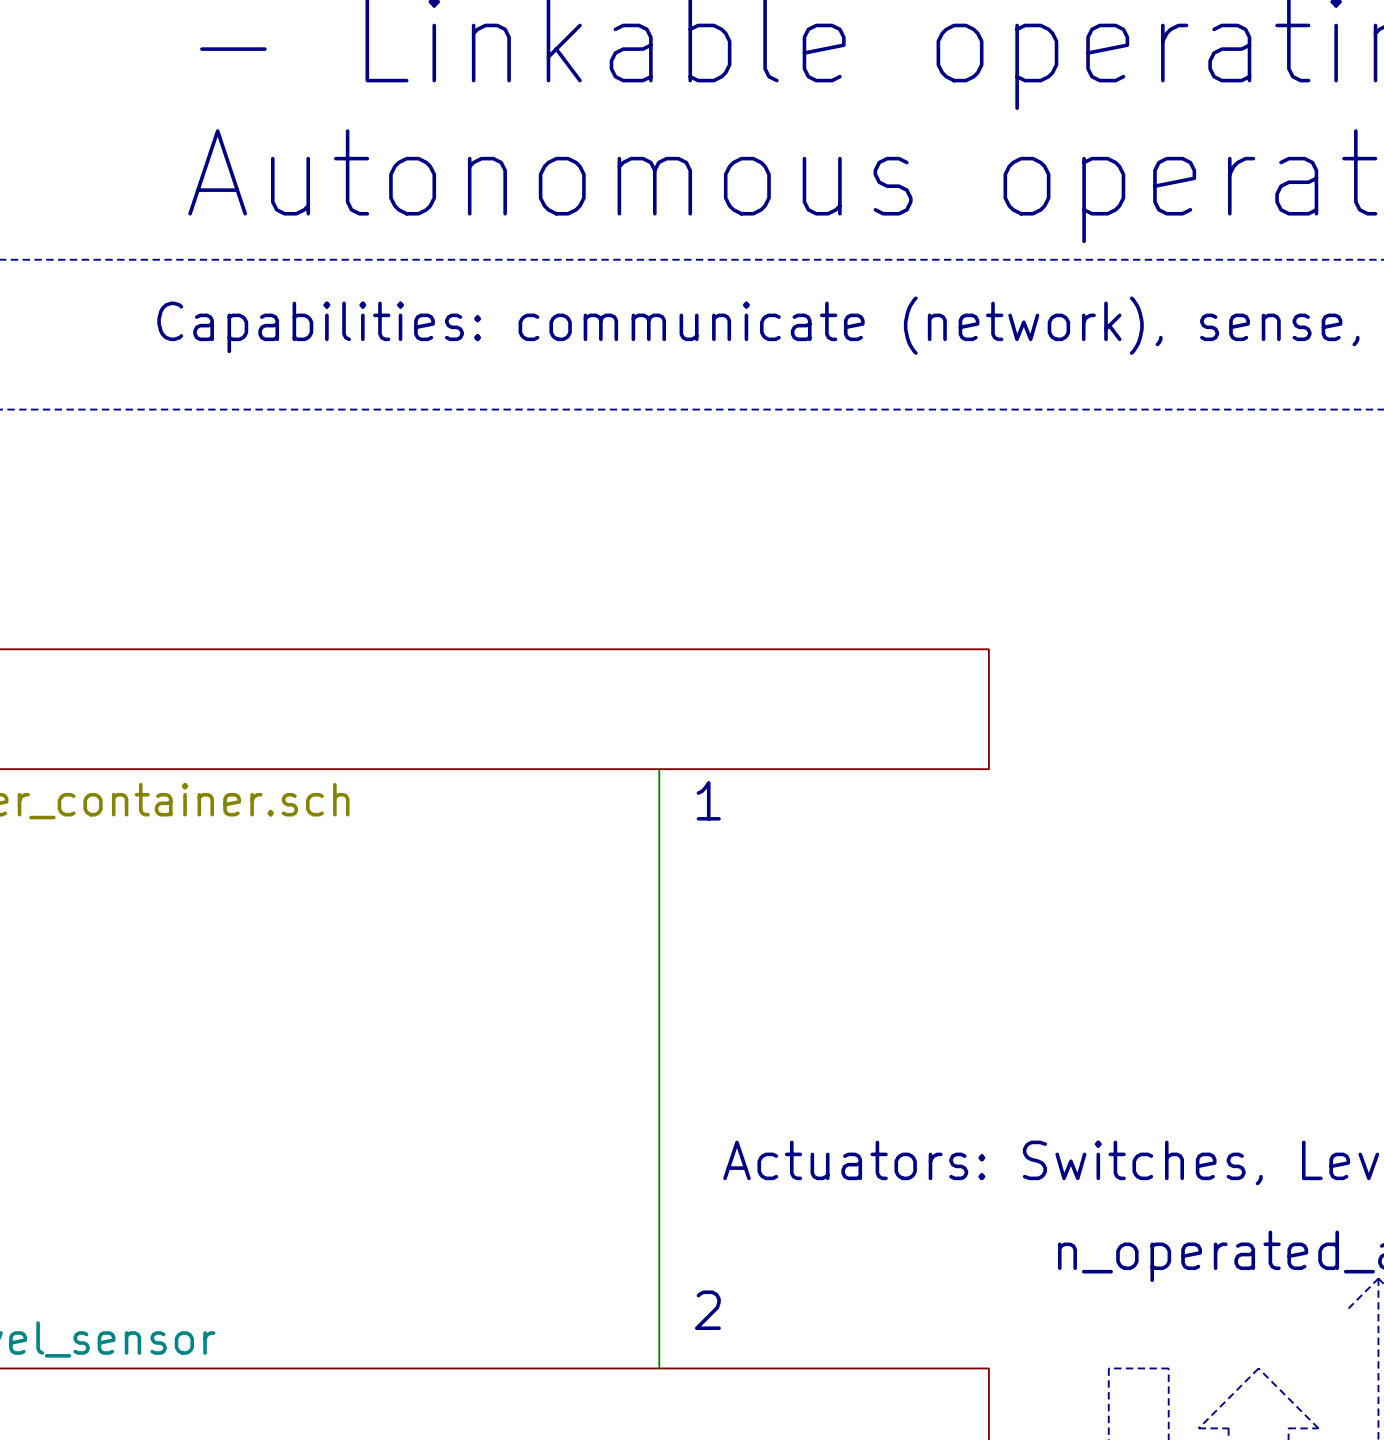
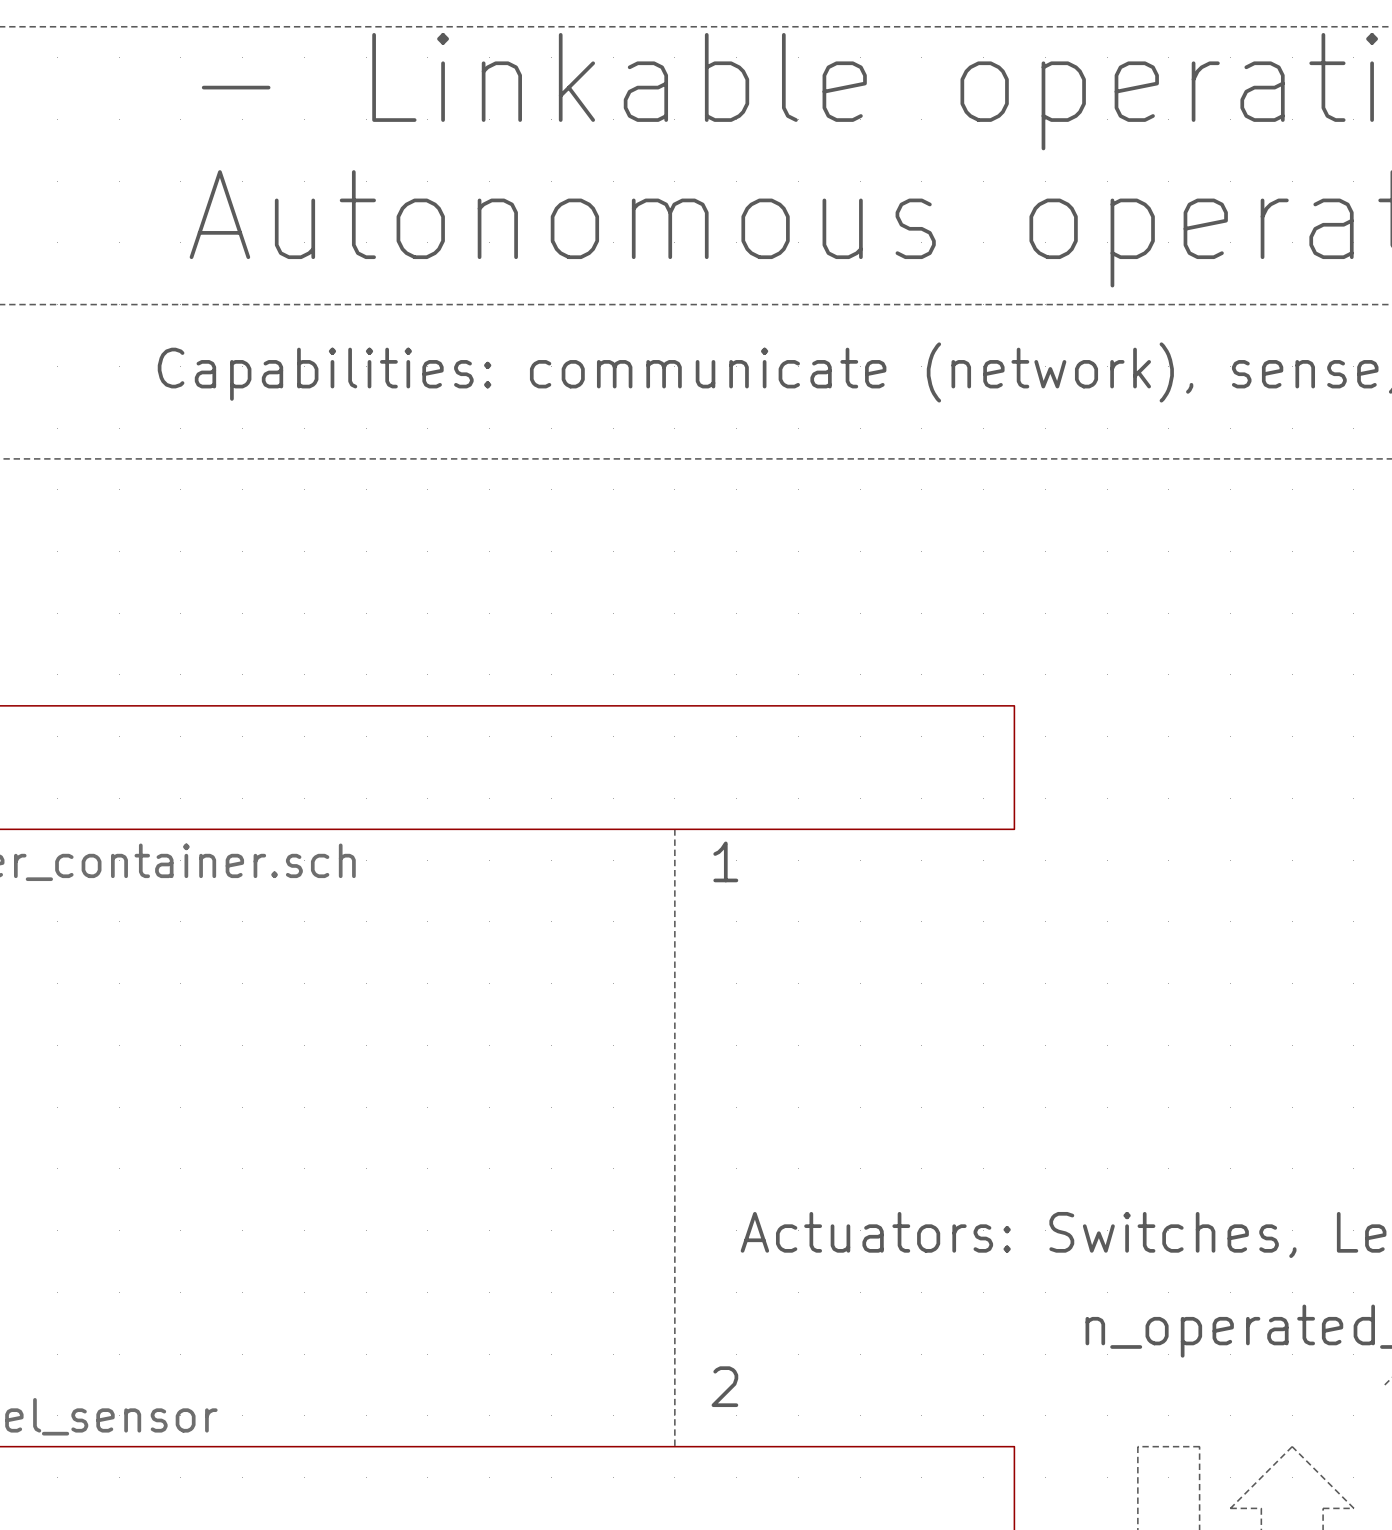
line: none -> (674, 829) (674, 1446)

